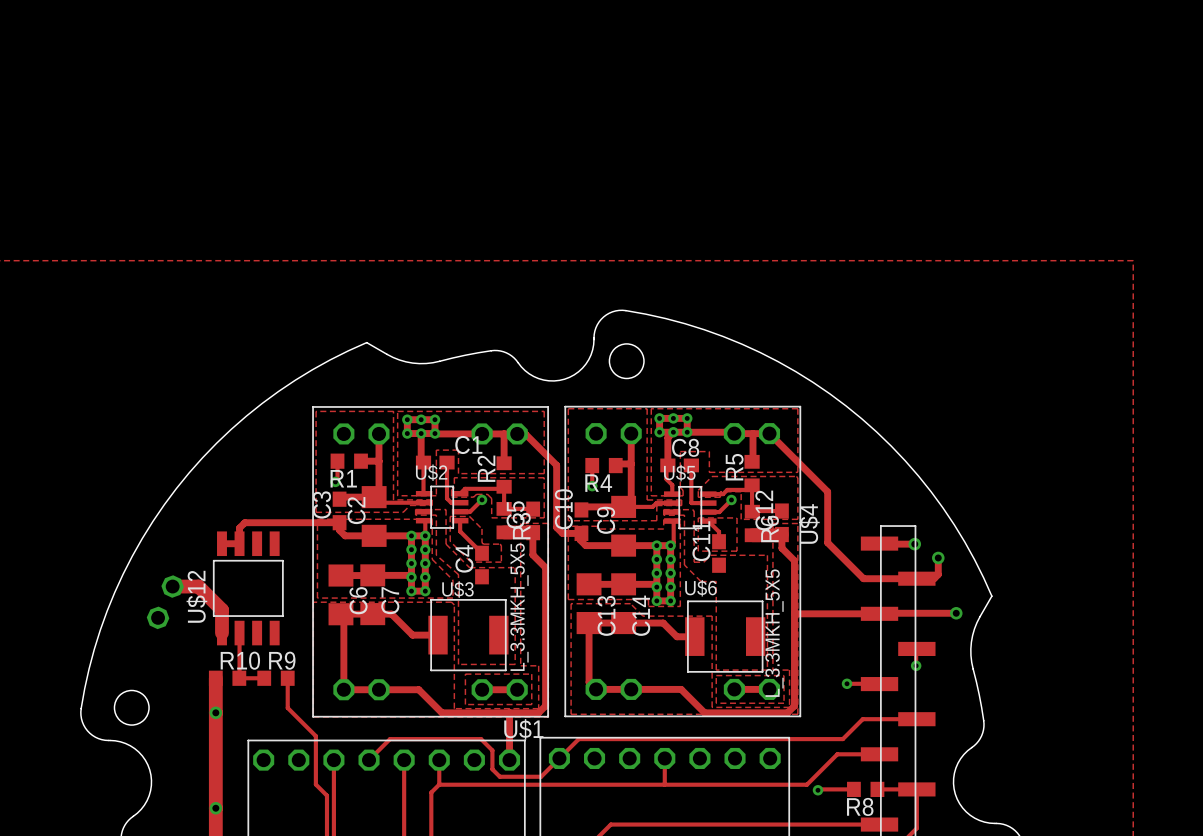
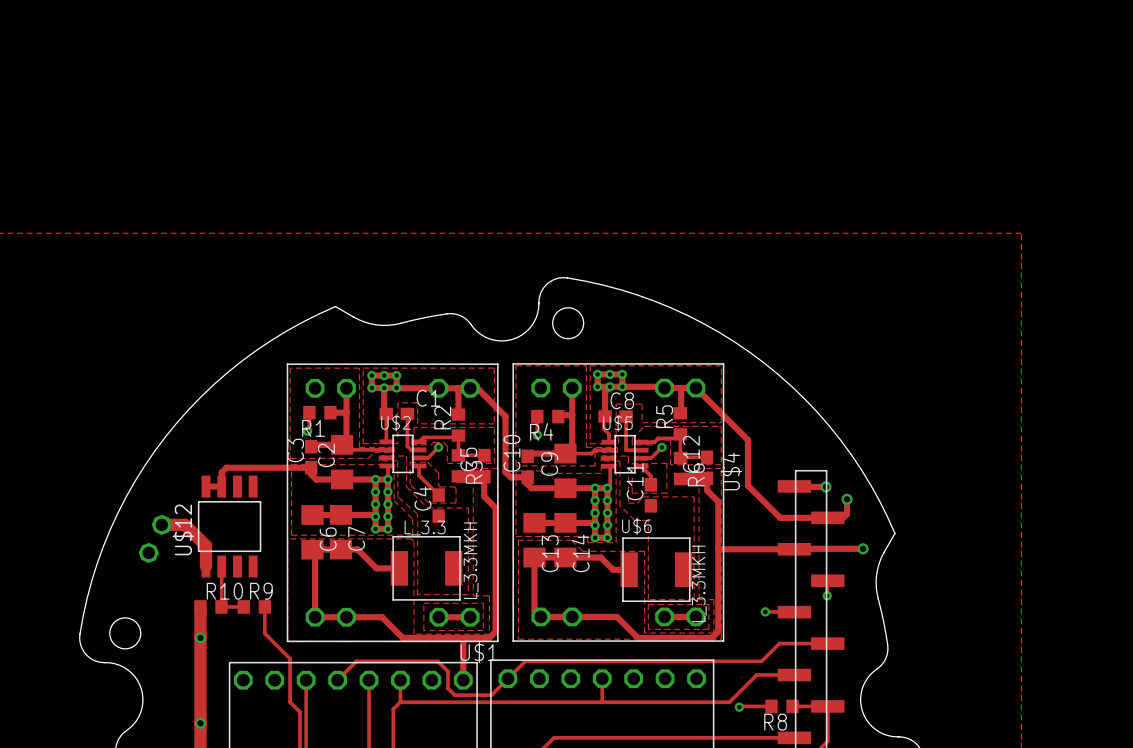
U$3 name: U$3 (457, 589) -> L_3.3 (425, 528)
U$3 value: L_3.3MKH_5X5 (519, 607) -> L_3.3MKH (471, 560)
U$6 value: L_3.3MKH_5X5 (774, 633) -> L_3.3MKH (699, 583)

